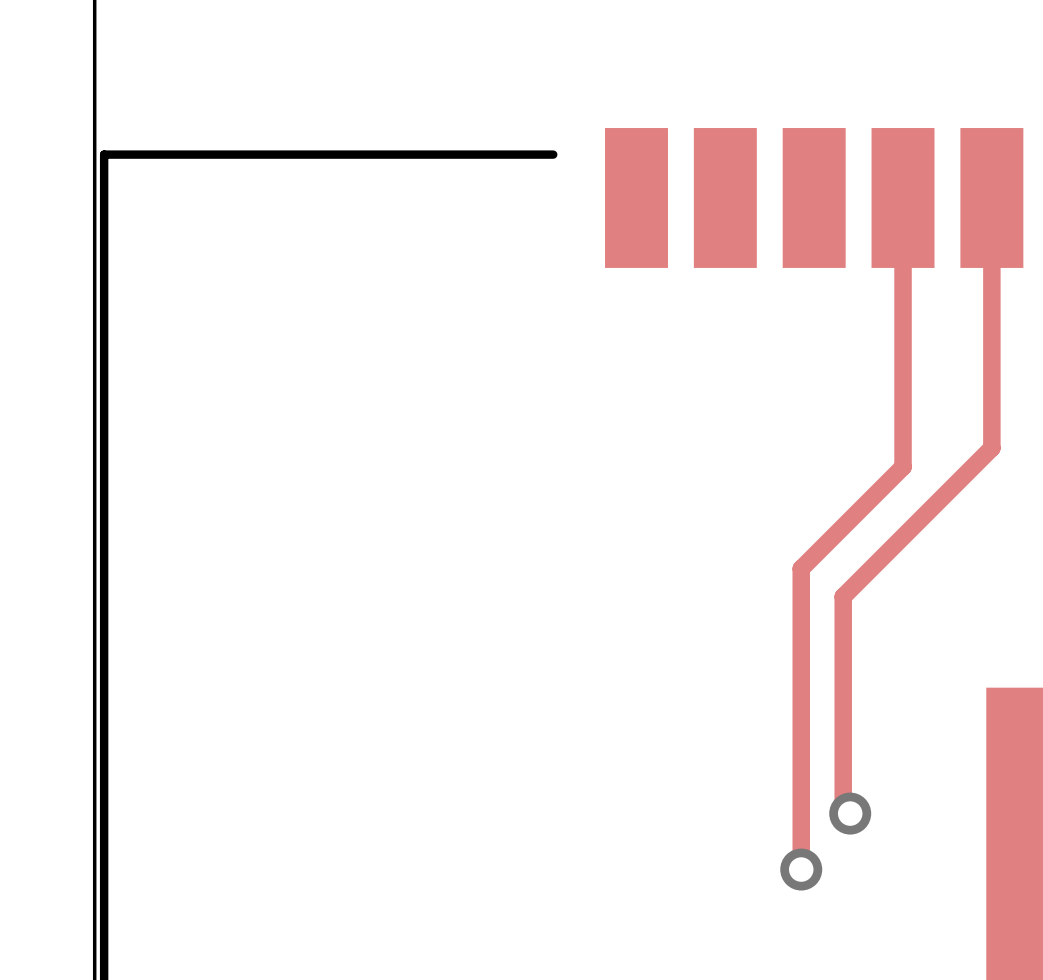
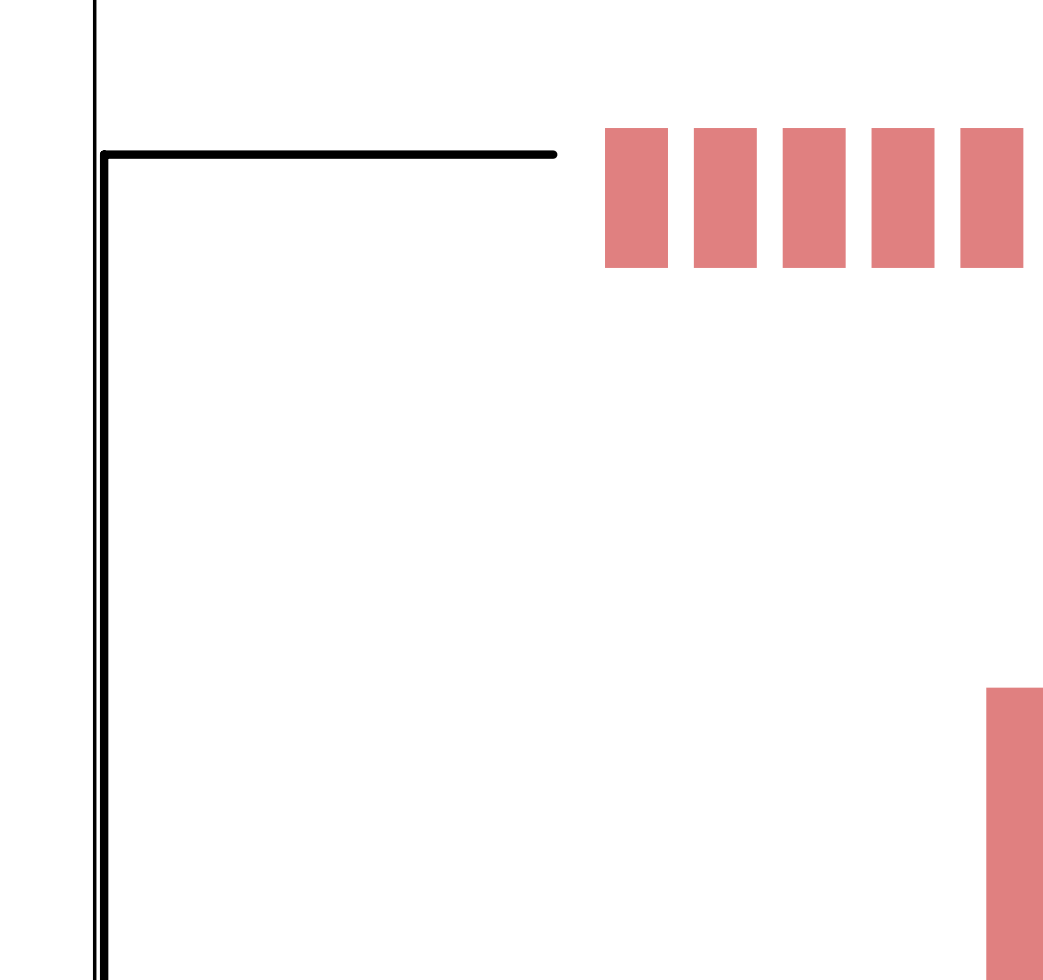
track: (903, 197) (903, 466) (801, 568) (801, 869) -> none
track: (991, 197) (991, 448) (843, 596) (843, 806) (850, 813) -> none
via: (850, 813) -> none
via: (801, 869) -> none

